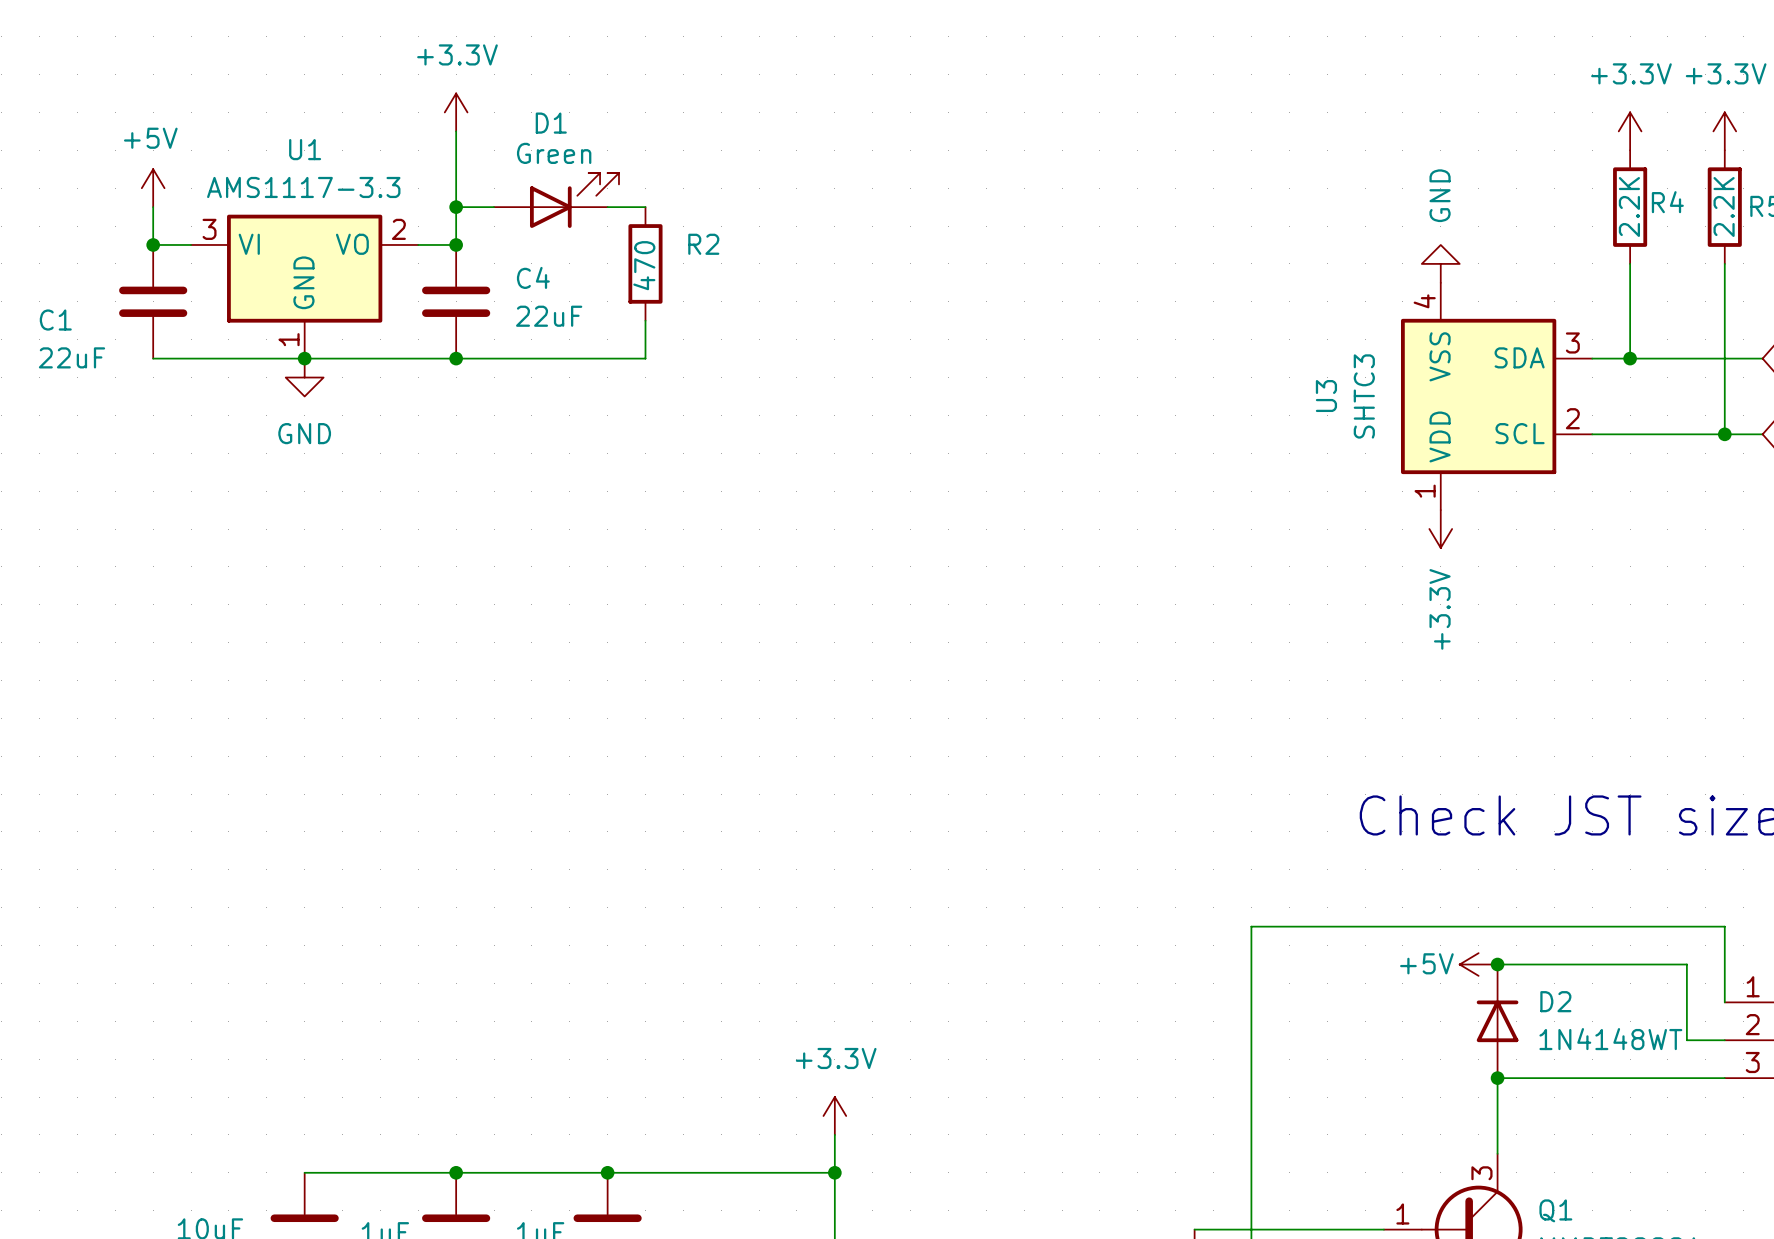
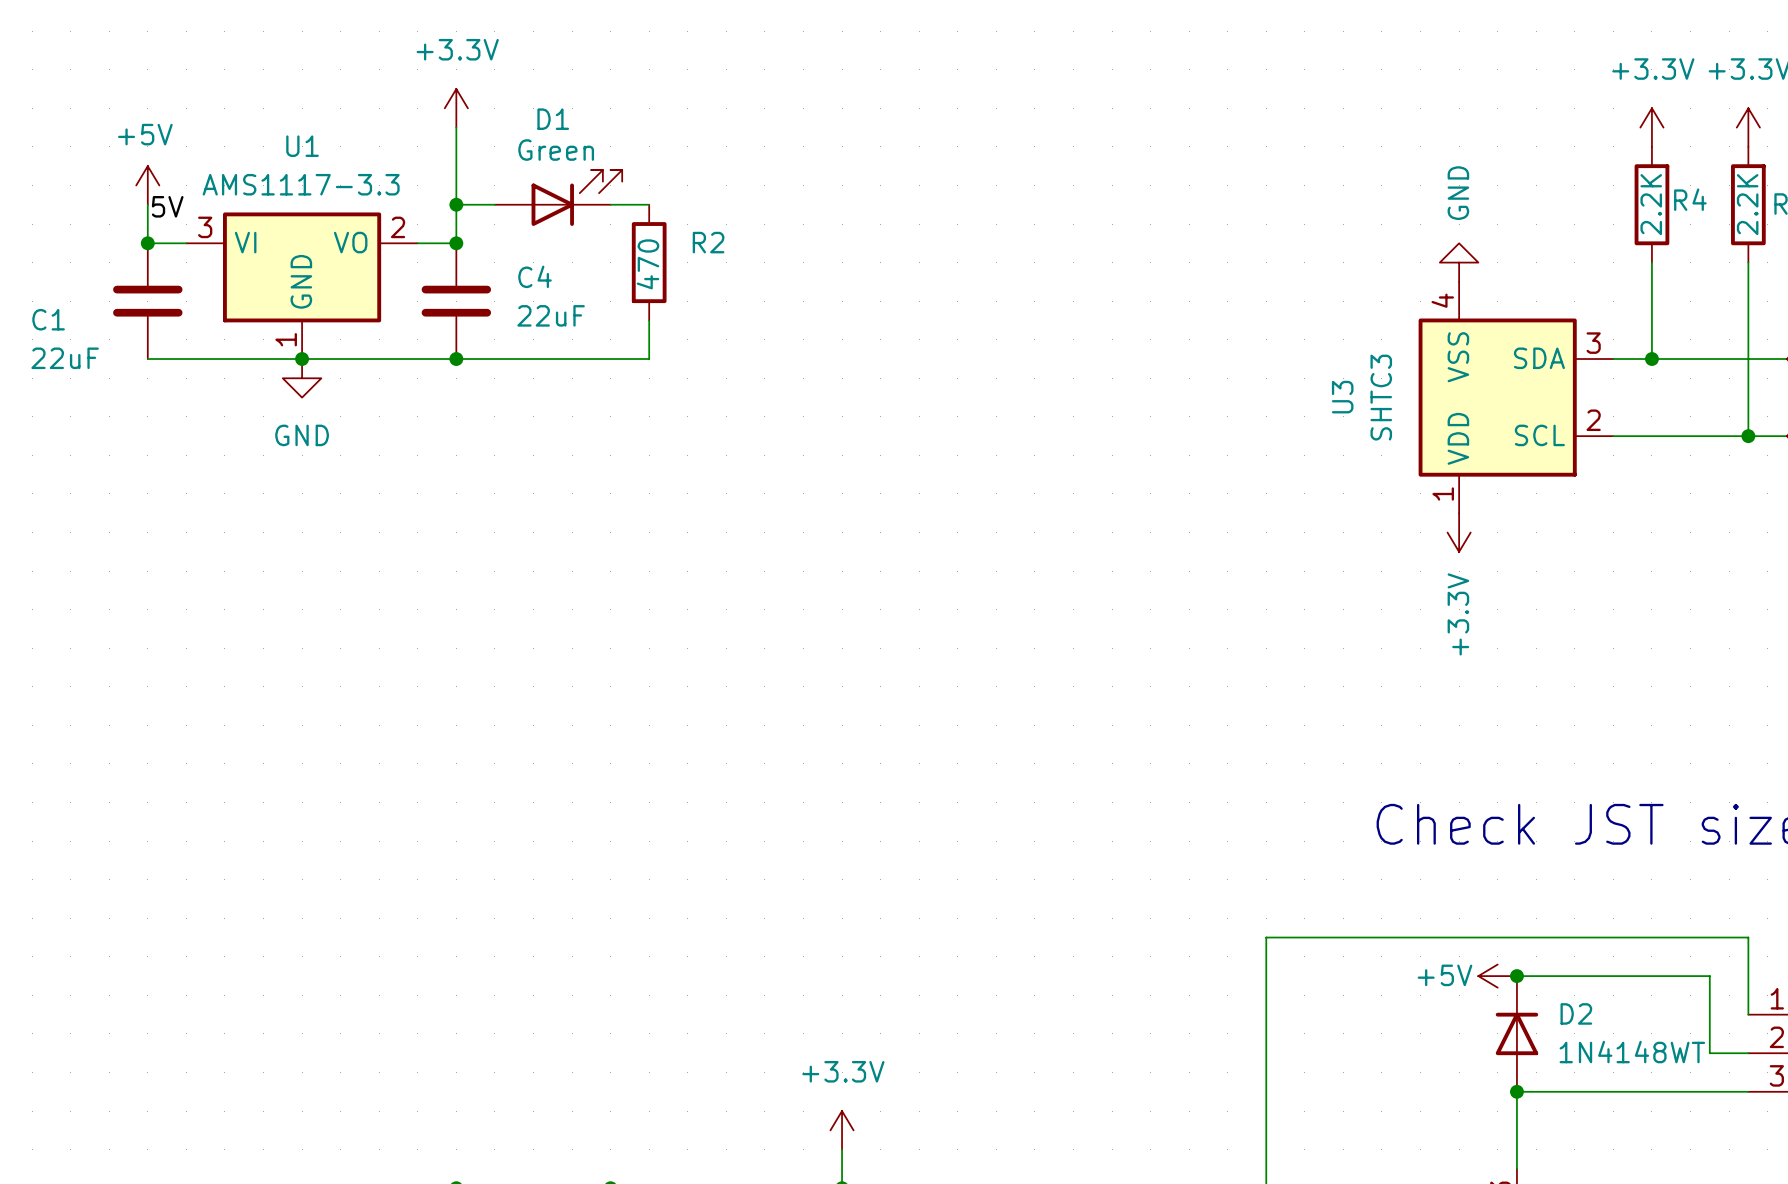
label: none -> 5V (167, 206)

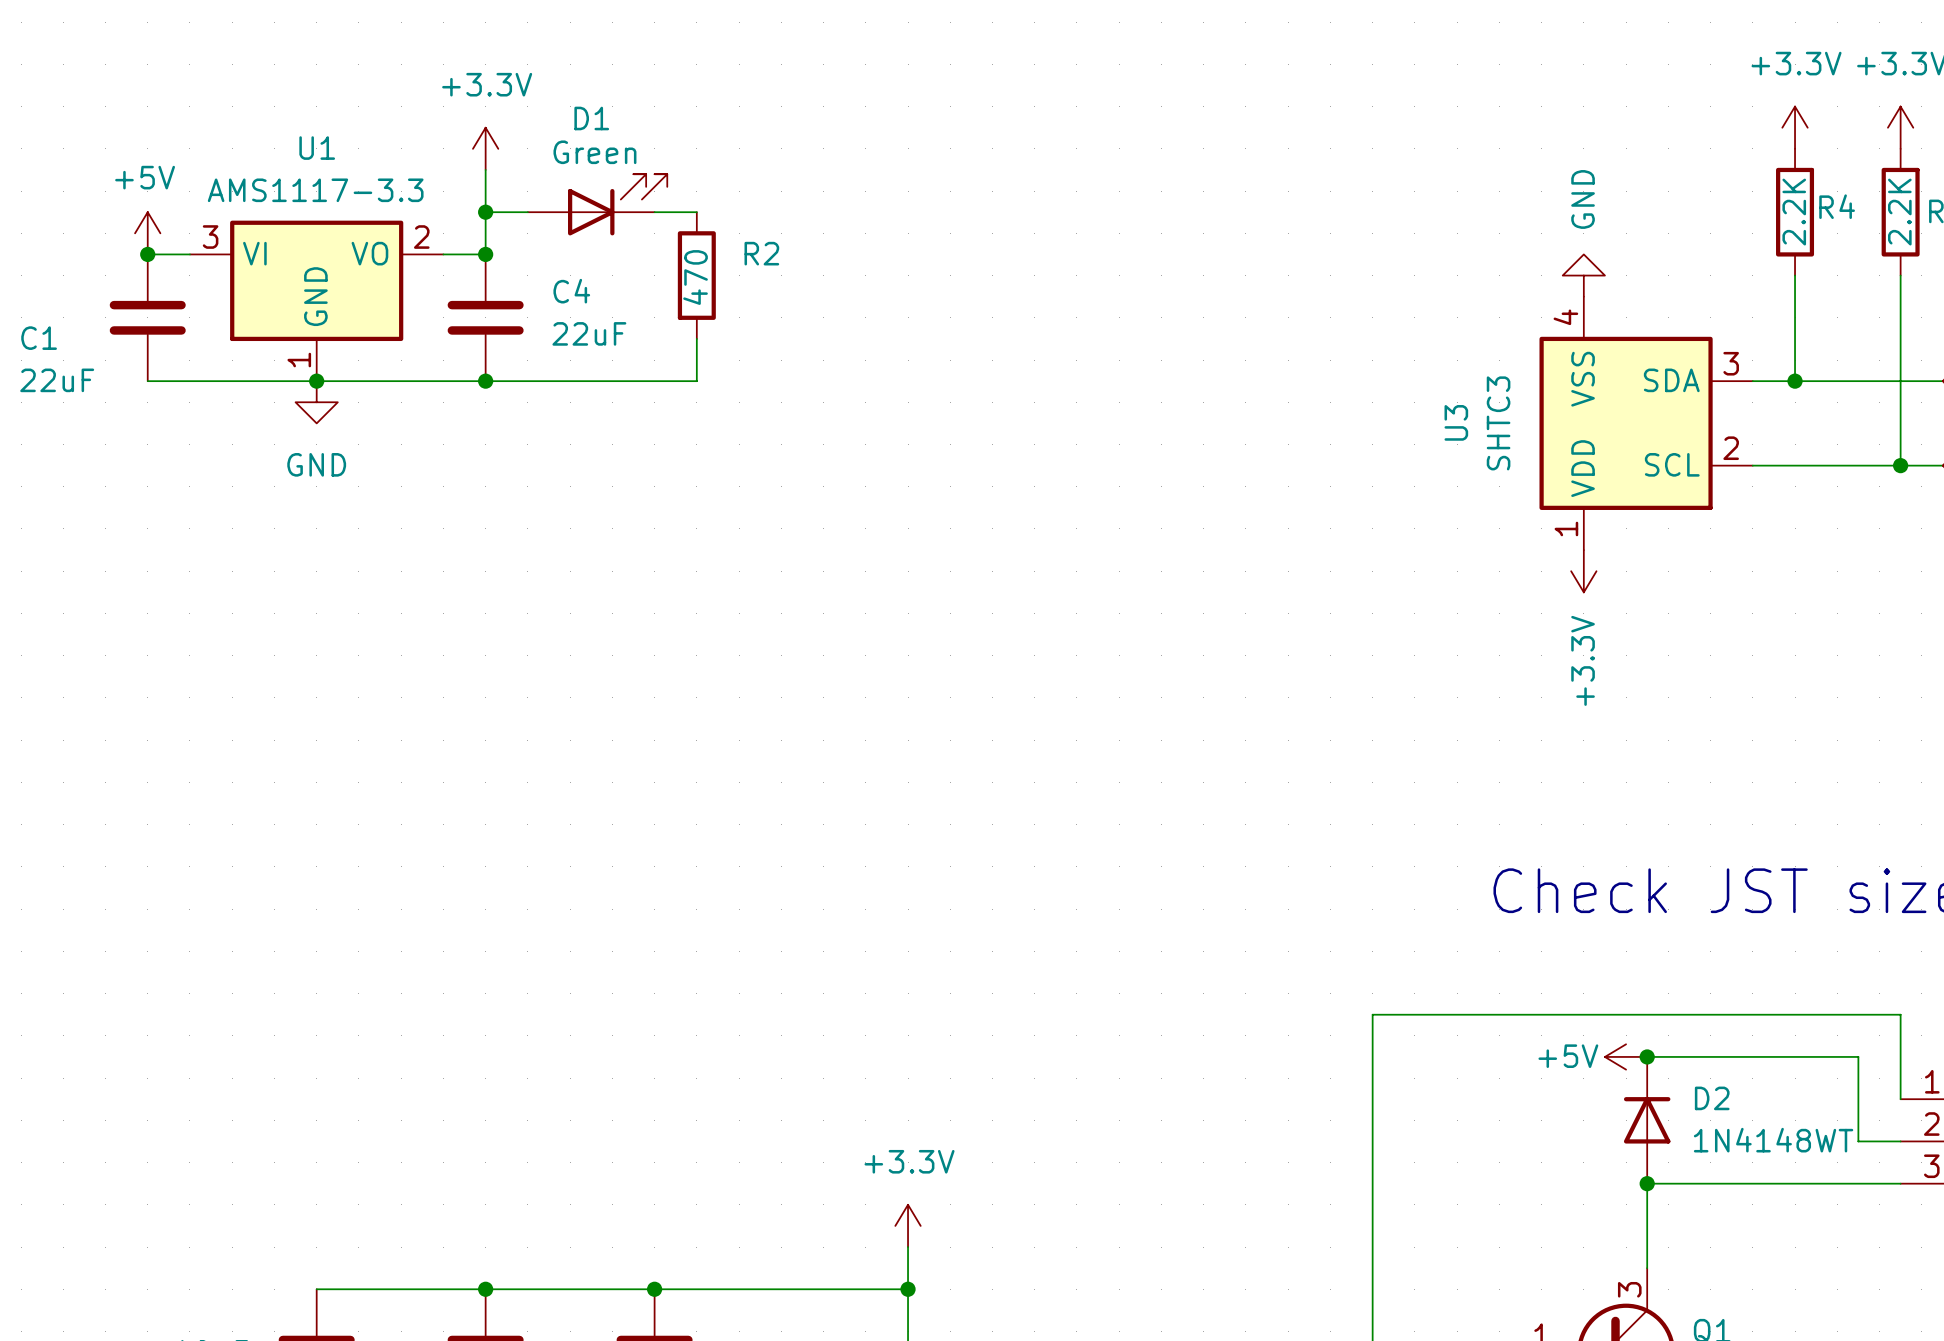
power symbol position: +3.3V (456, 108) -> +3.3V (485, 148)
power symbol position: +5V (147, 185) -> +5V (147, 233)
label: 5V (167, 206) -> none

